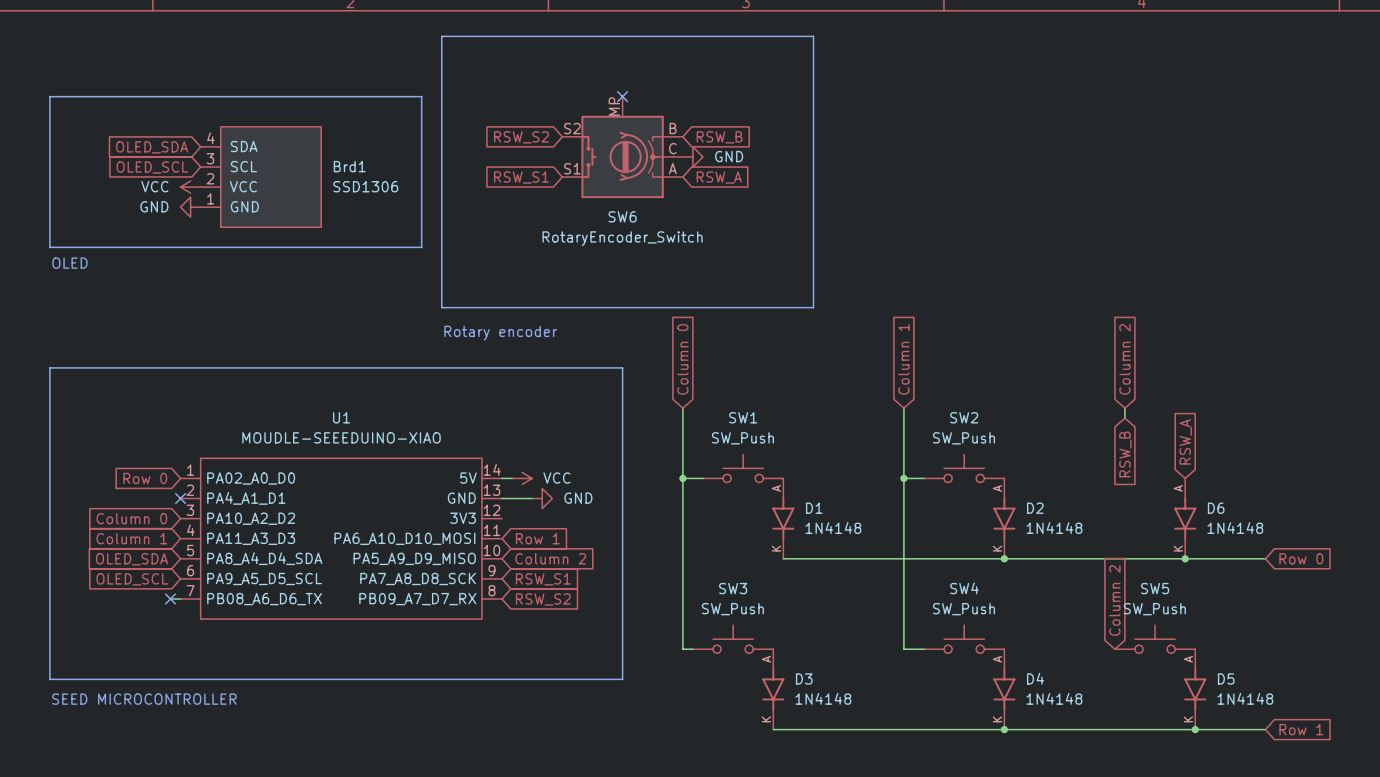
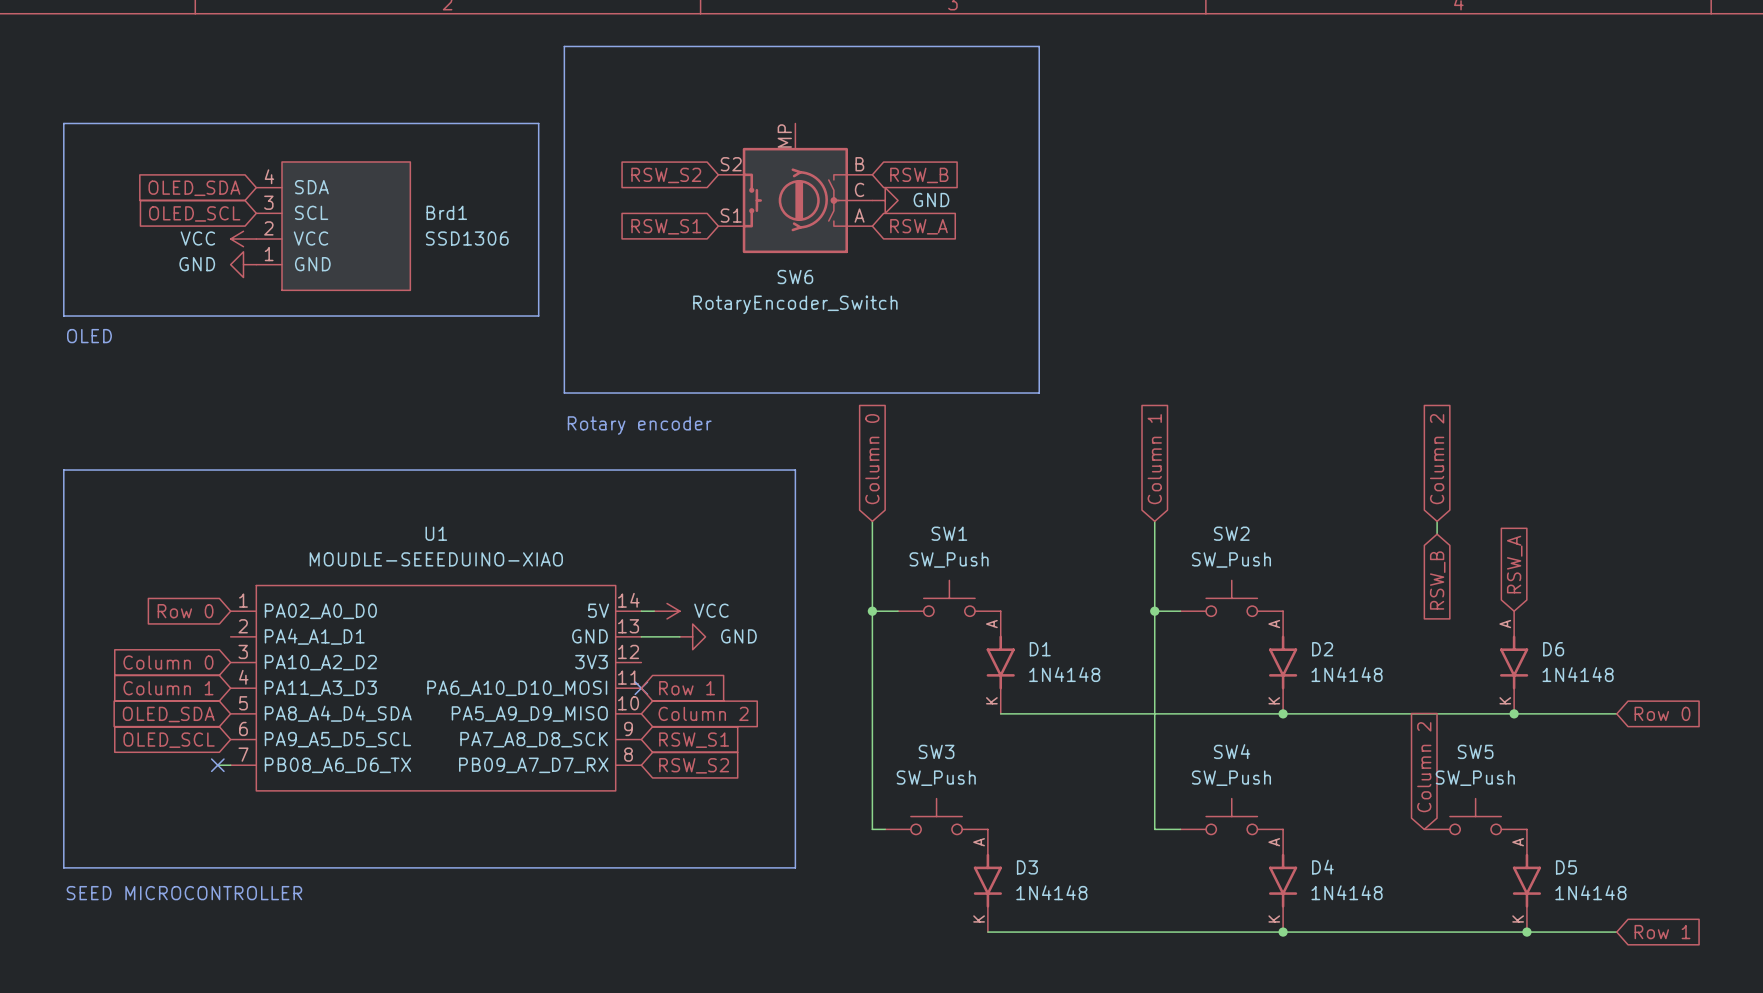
no-connect mark: (622, 96) -> none
no-connect mark: (180, 498) -> none
no-connect mark: none -> (641, 688)

